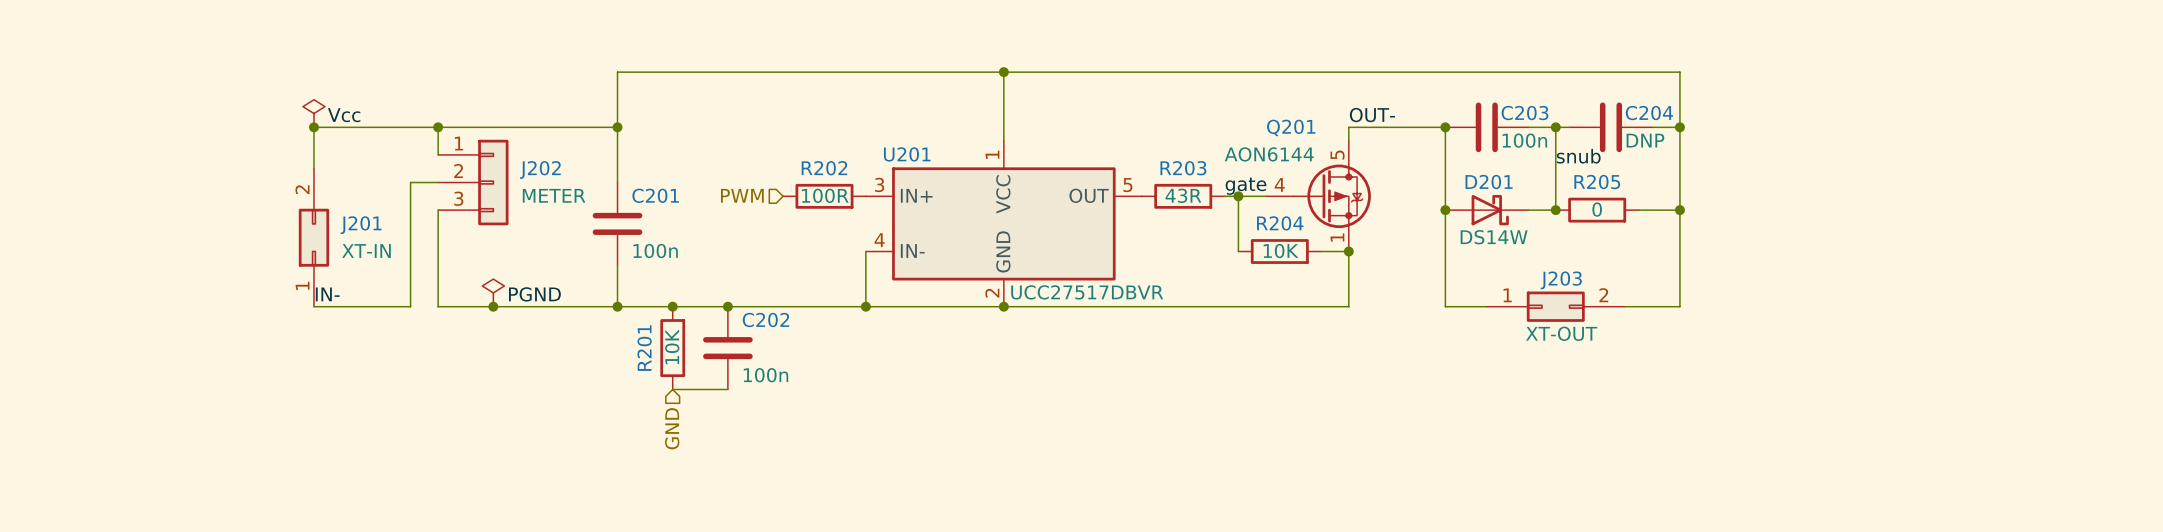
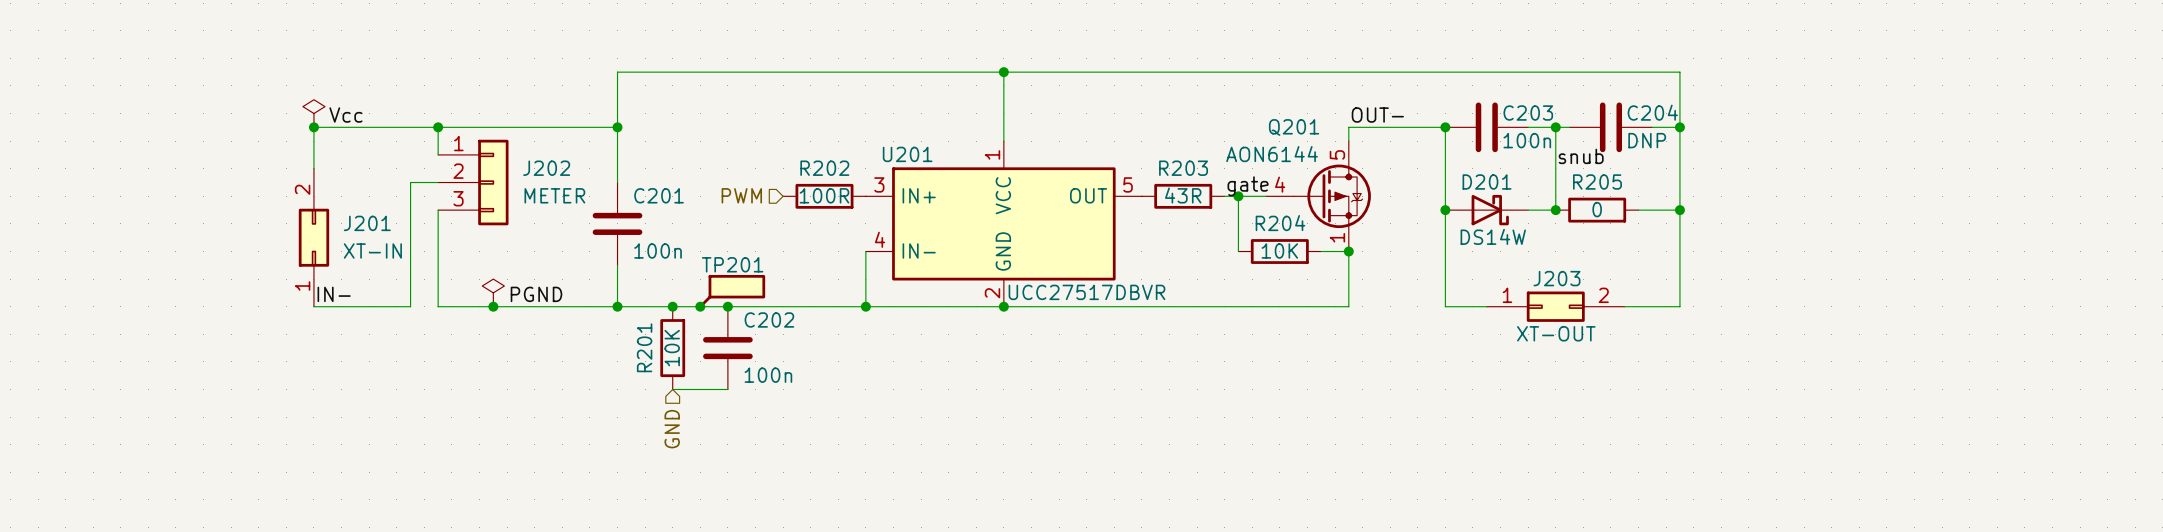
TP201: none -> (732, 291)
junction: none -> (700, 306)

